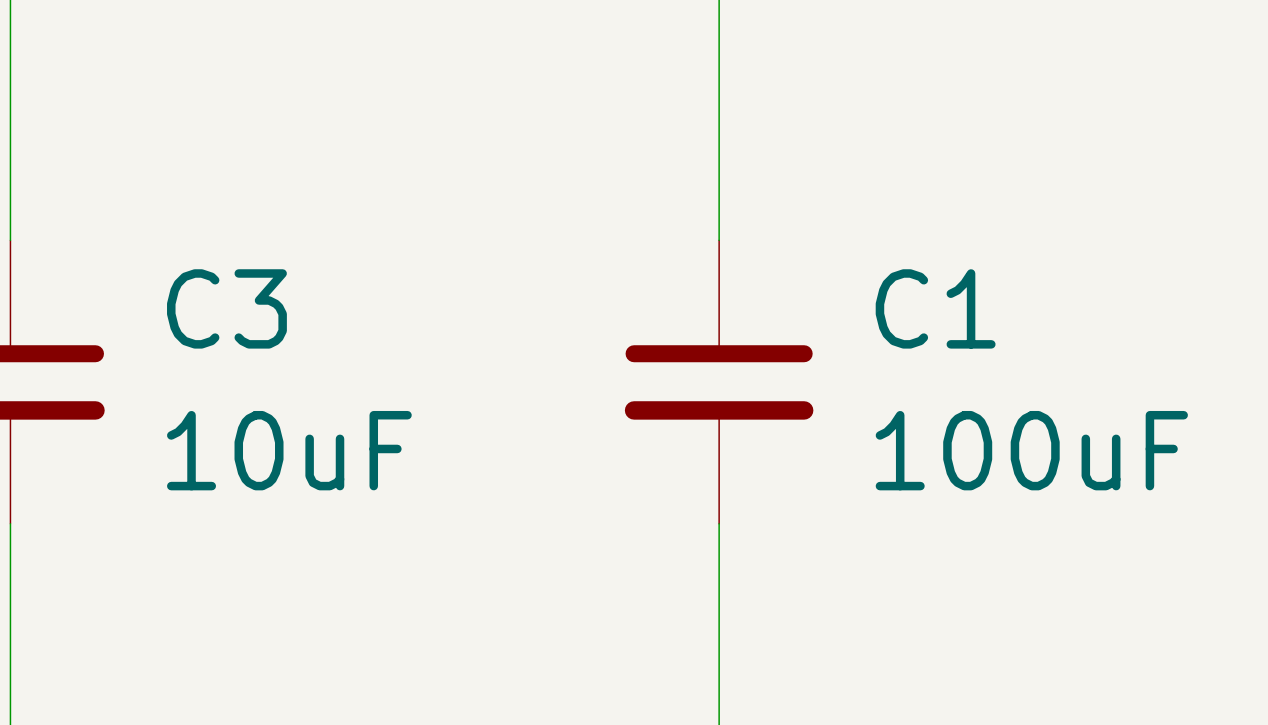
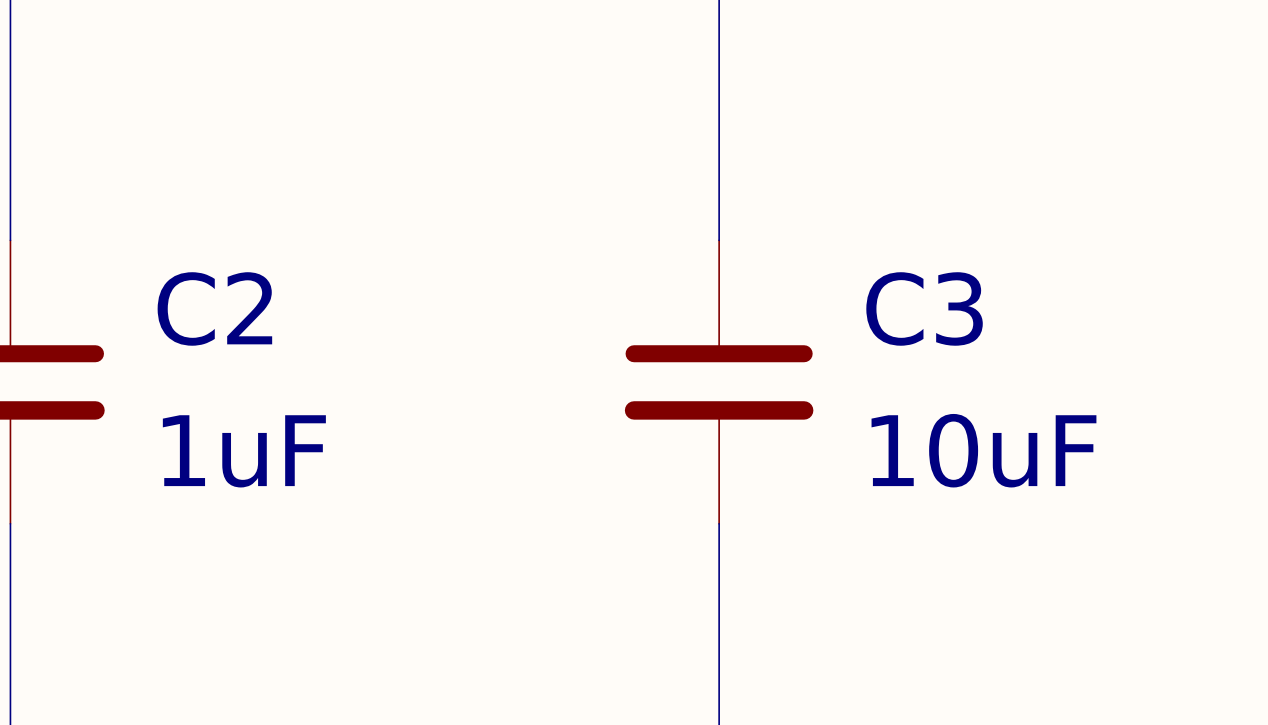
C3 name: C3 (226, 308) -> C2 (214, 308)
C1 name: C1 (935, 308) -> C3 (924, 308)
C3 value: 10uF (289, 450) -> 1uF (244, 451)
C1 value: 100uF (1031, 450) -> 10uF (983, 450)

